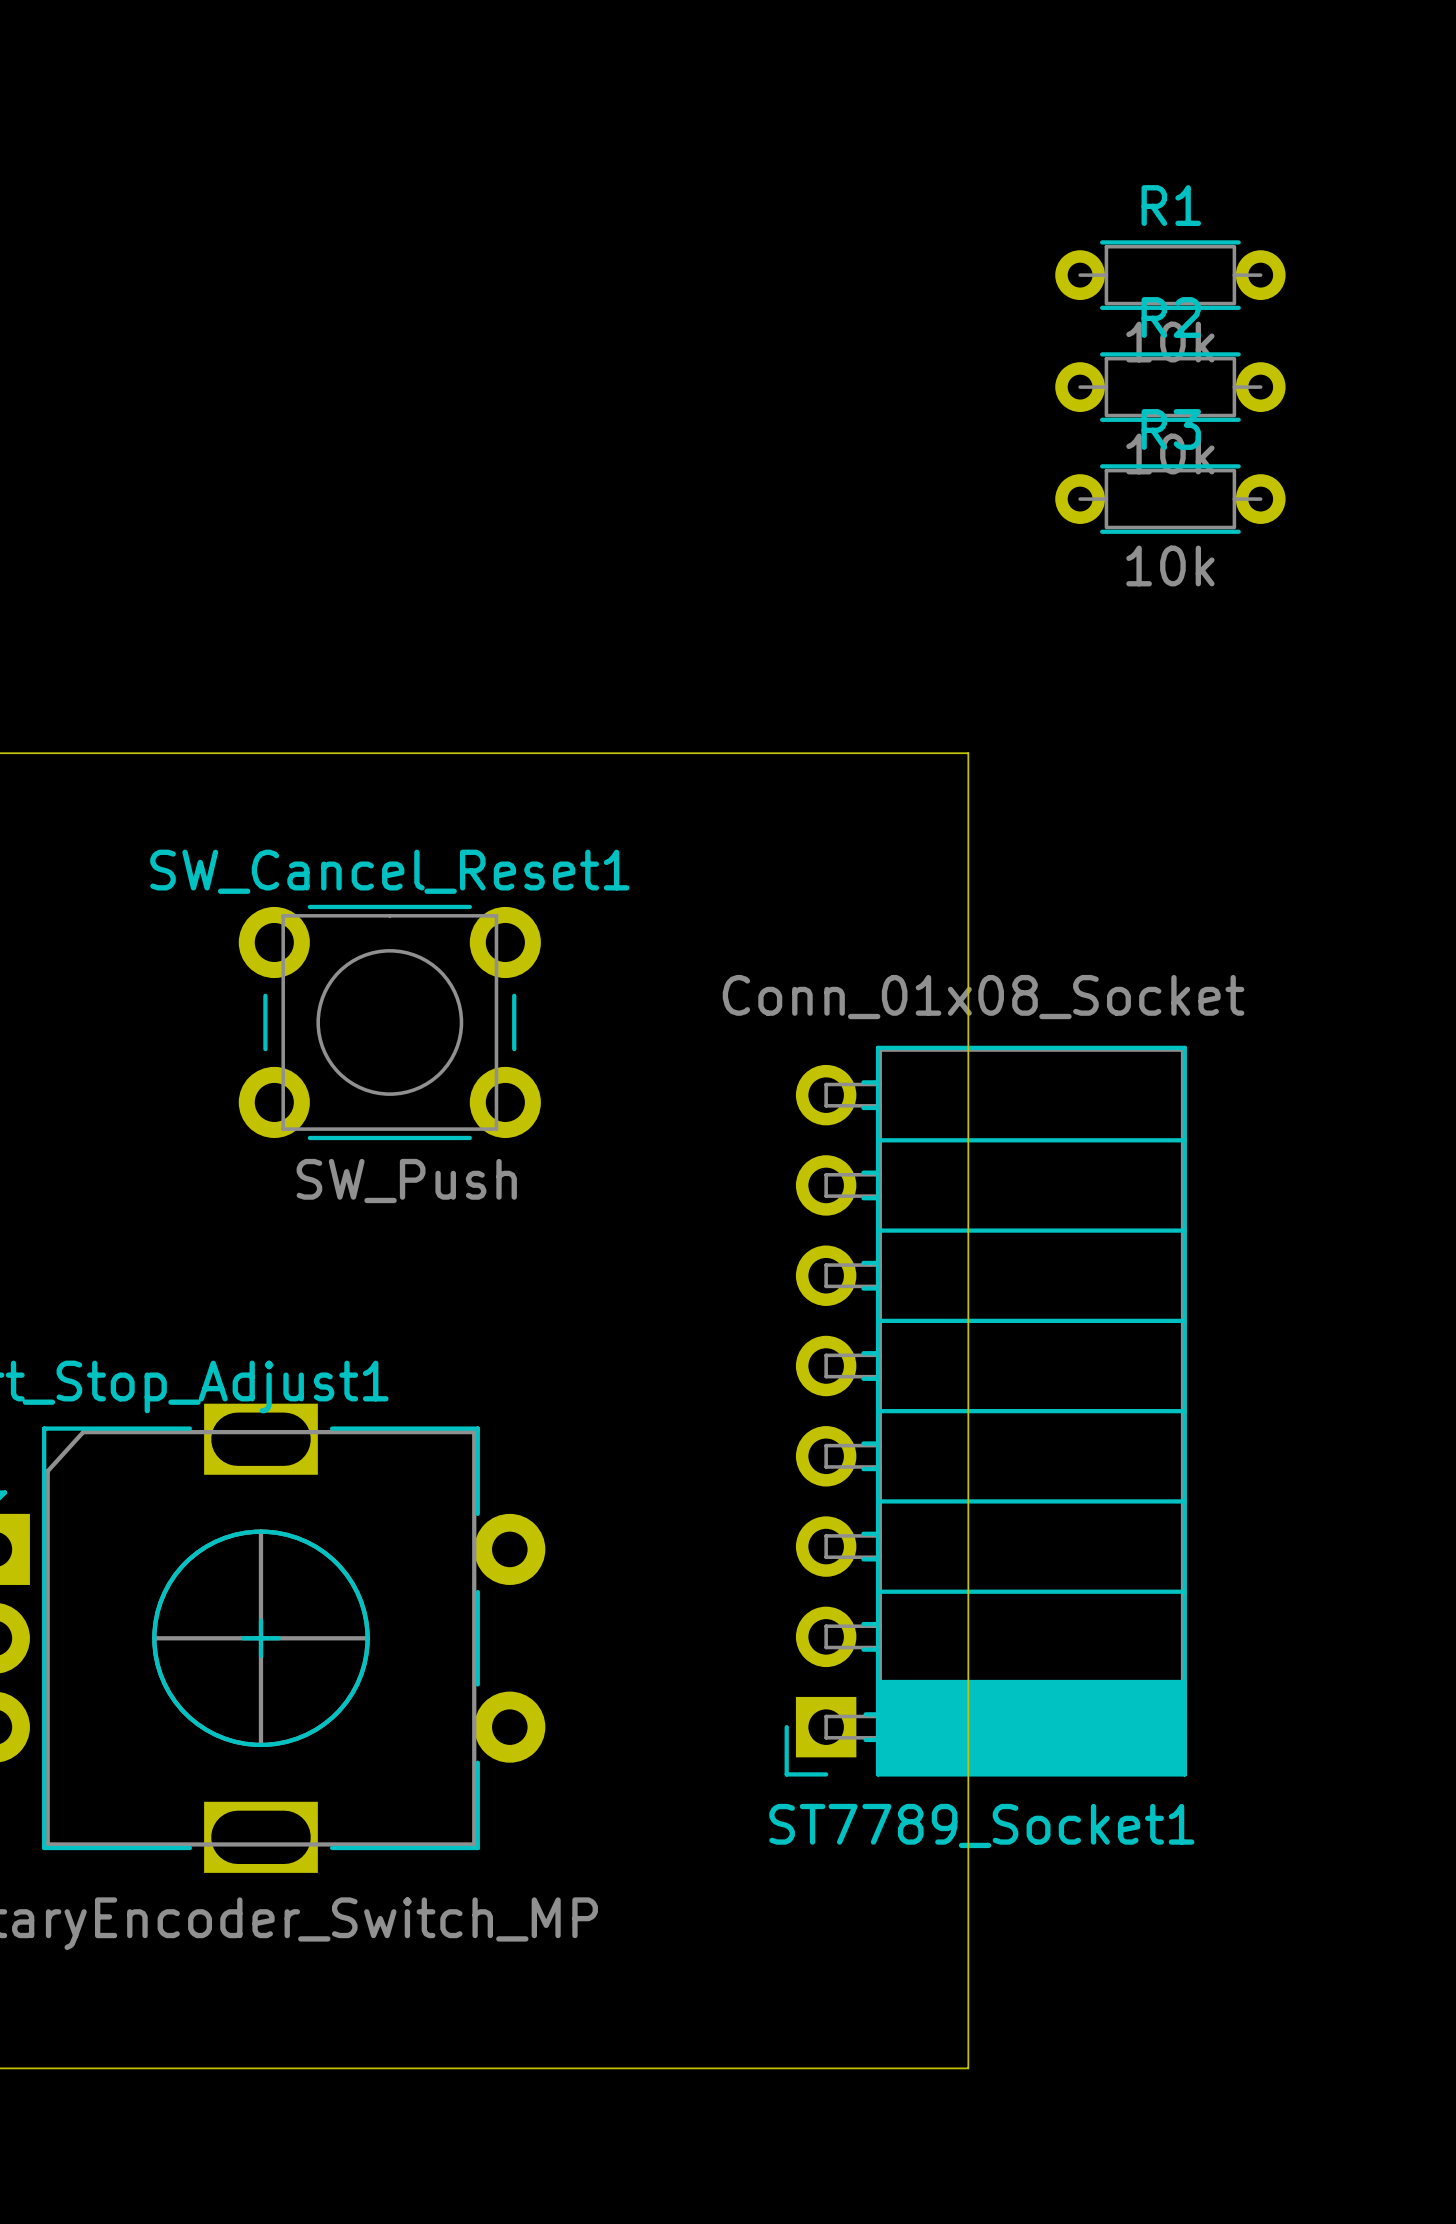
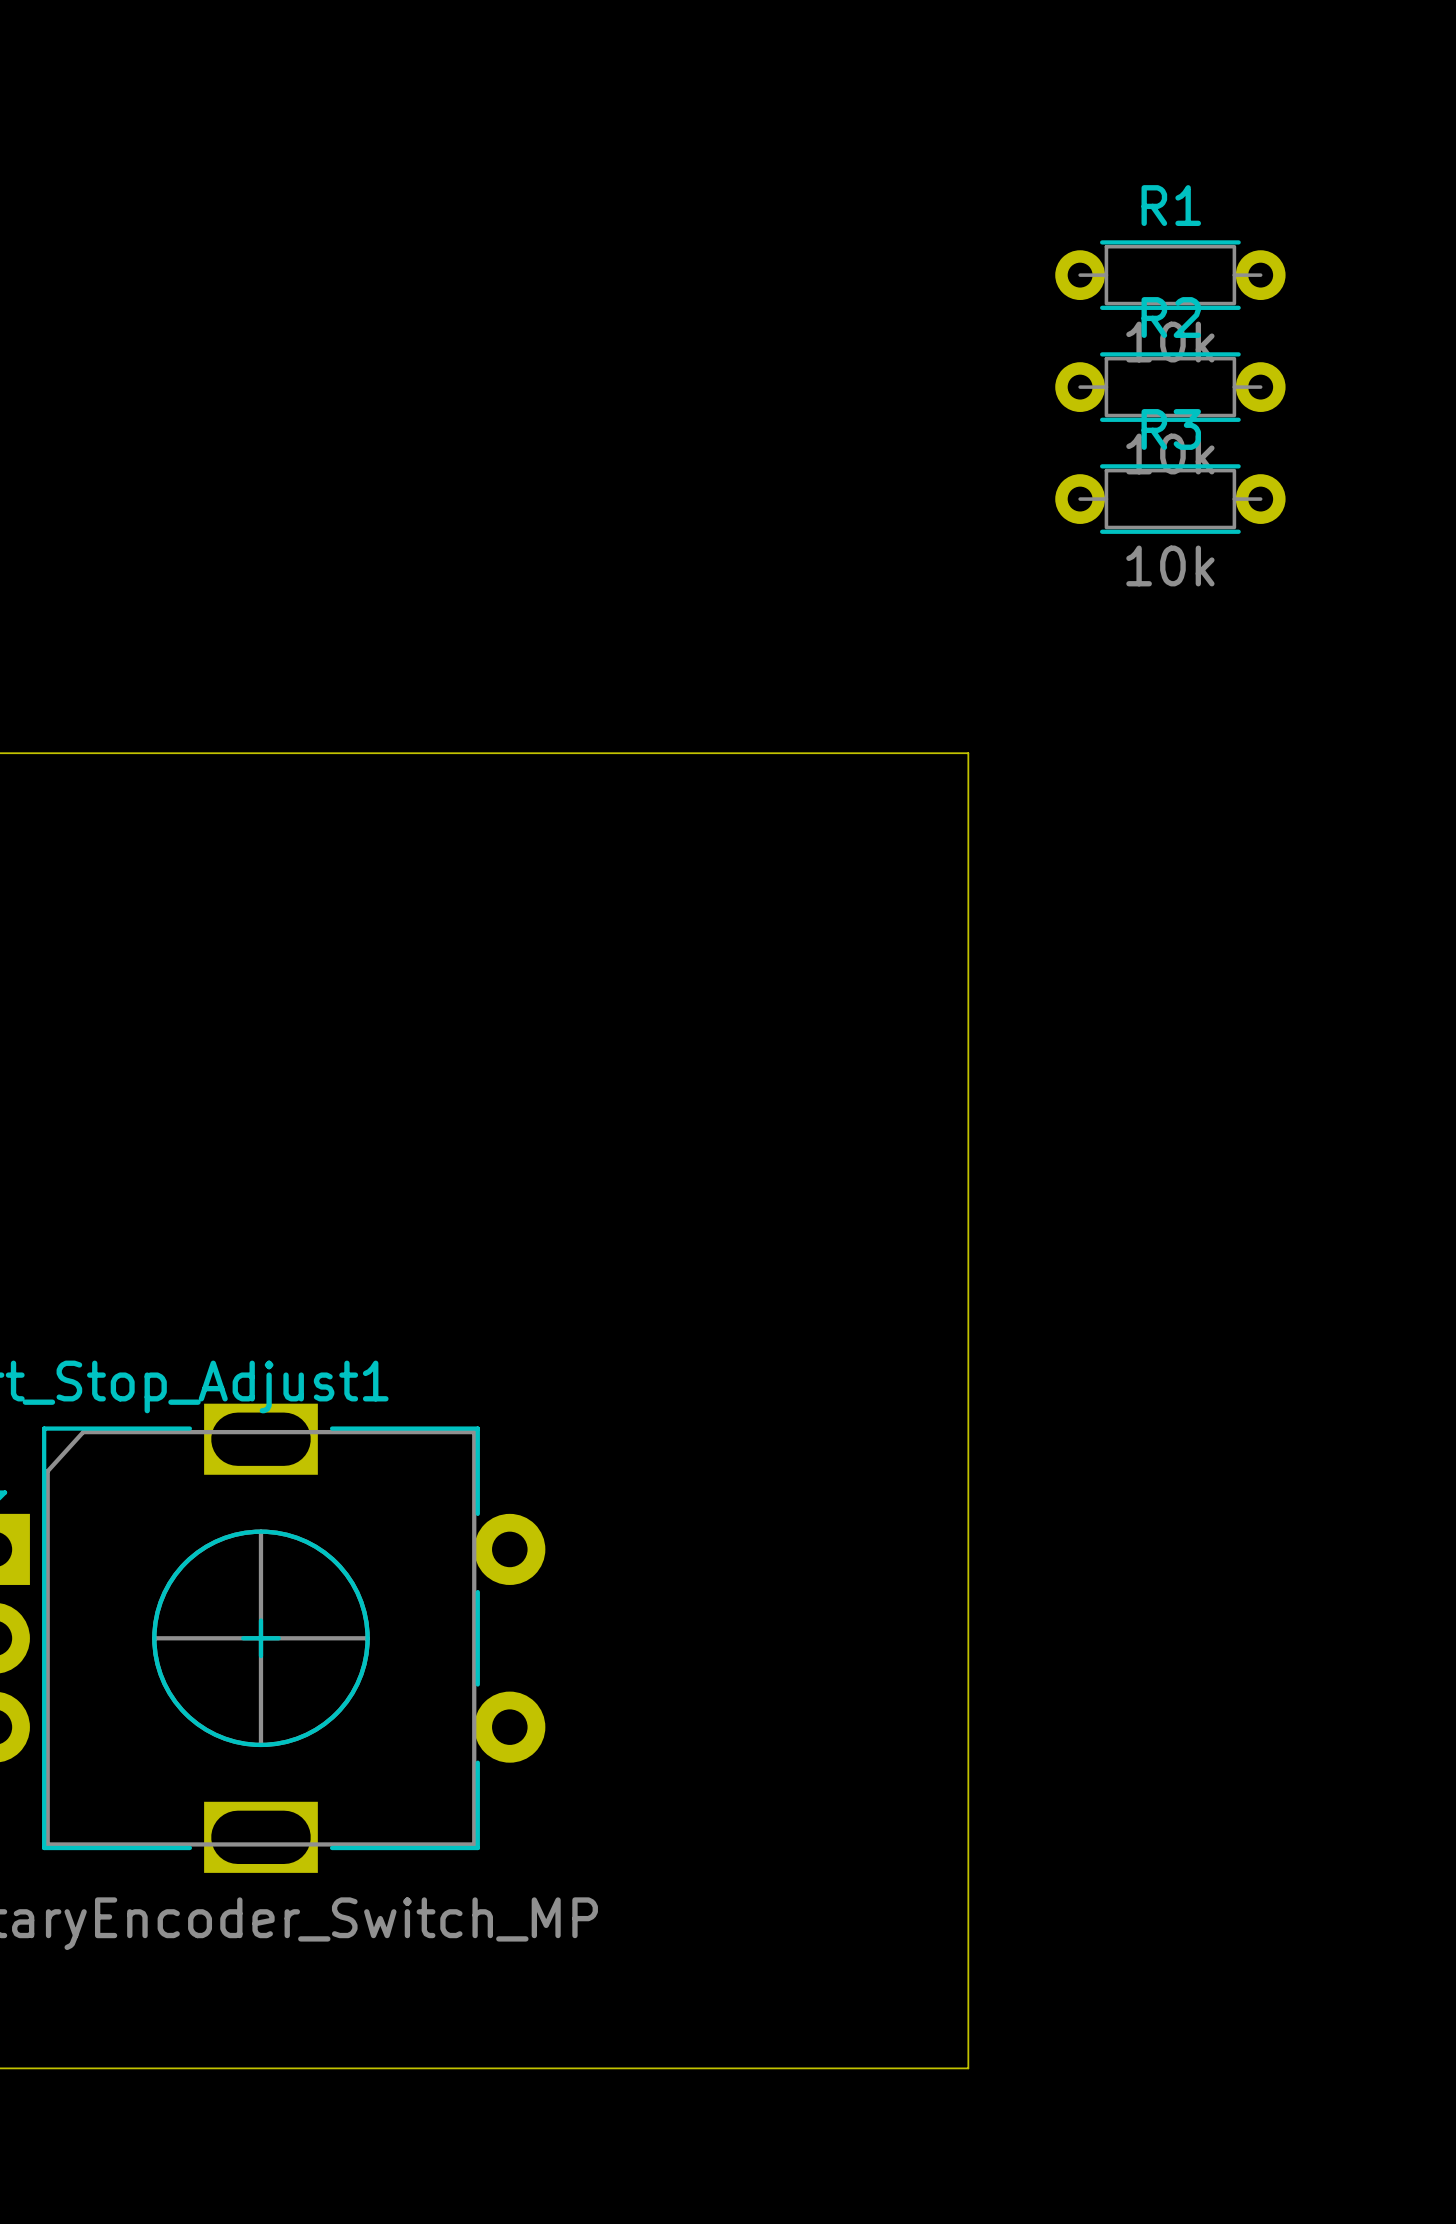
SW_Cancel_Reset1: SW_Push (389, 1022) -> none
ST7789_Socket1: Conn_01x08_Socket (985, 1411) -> none

